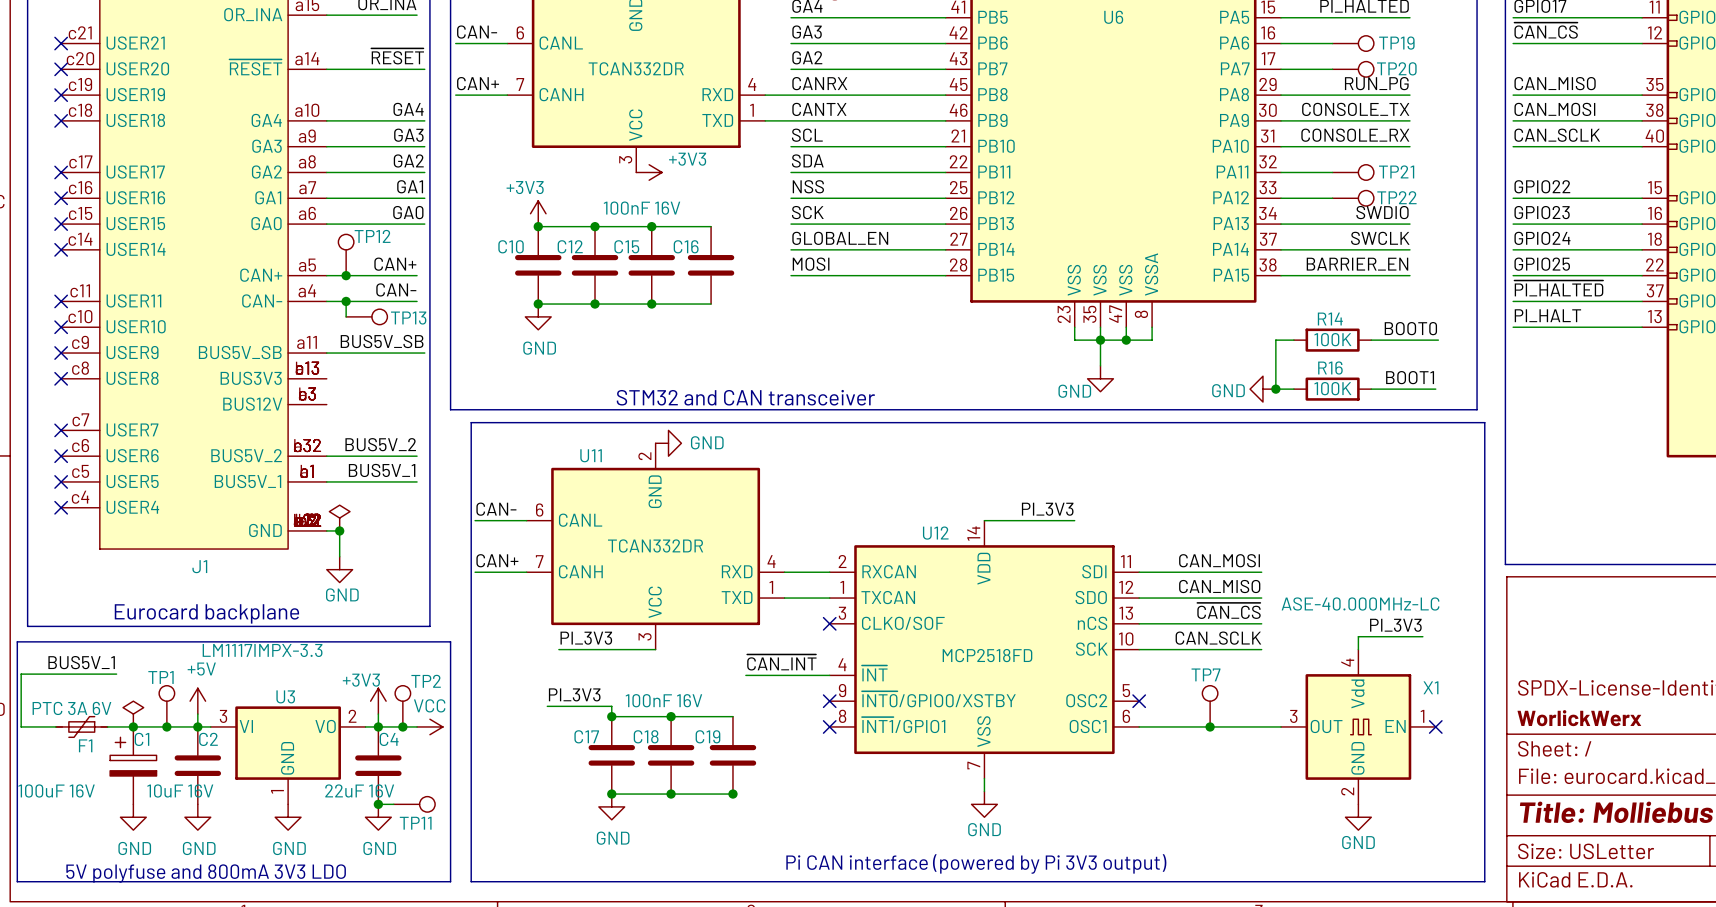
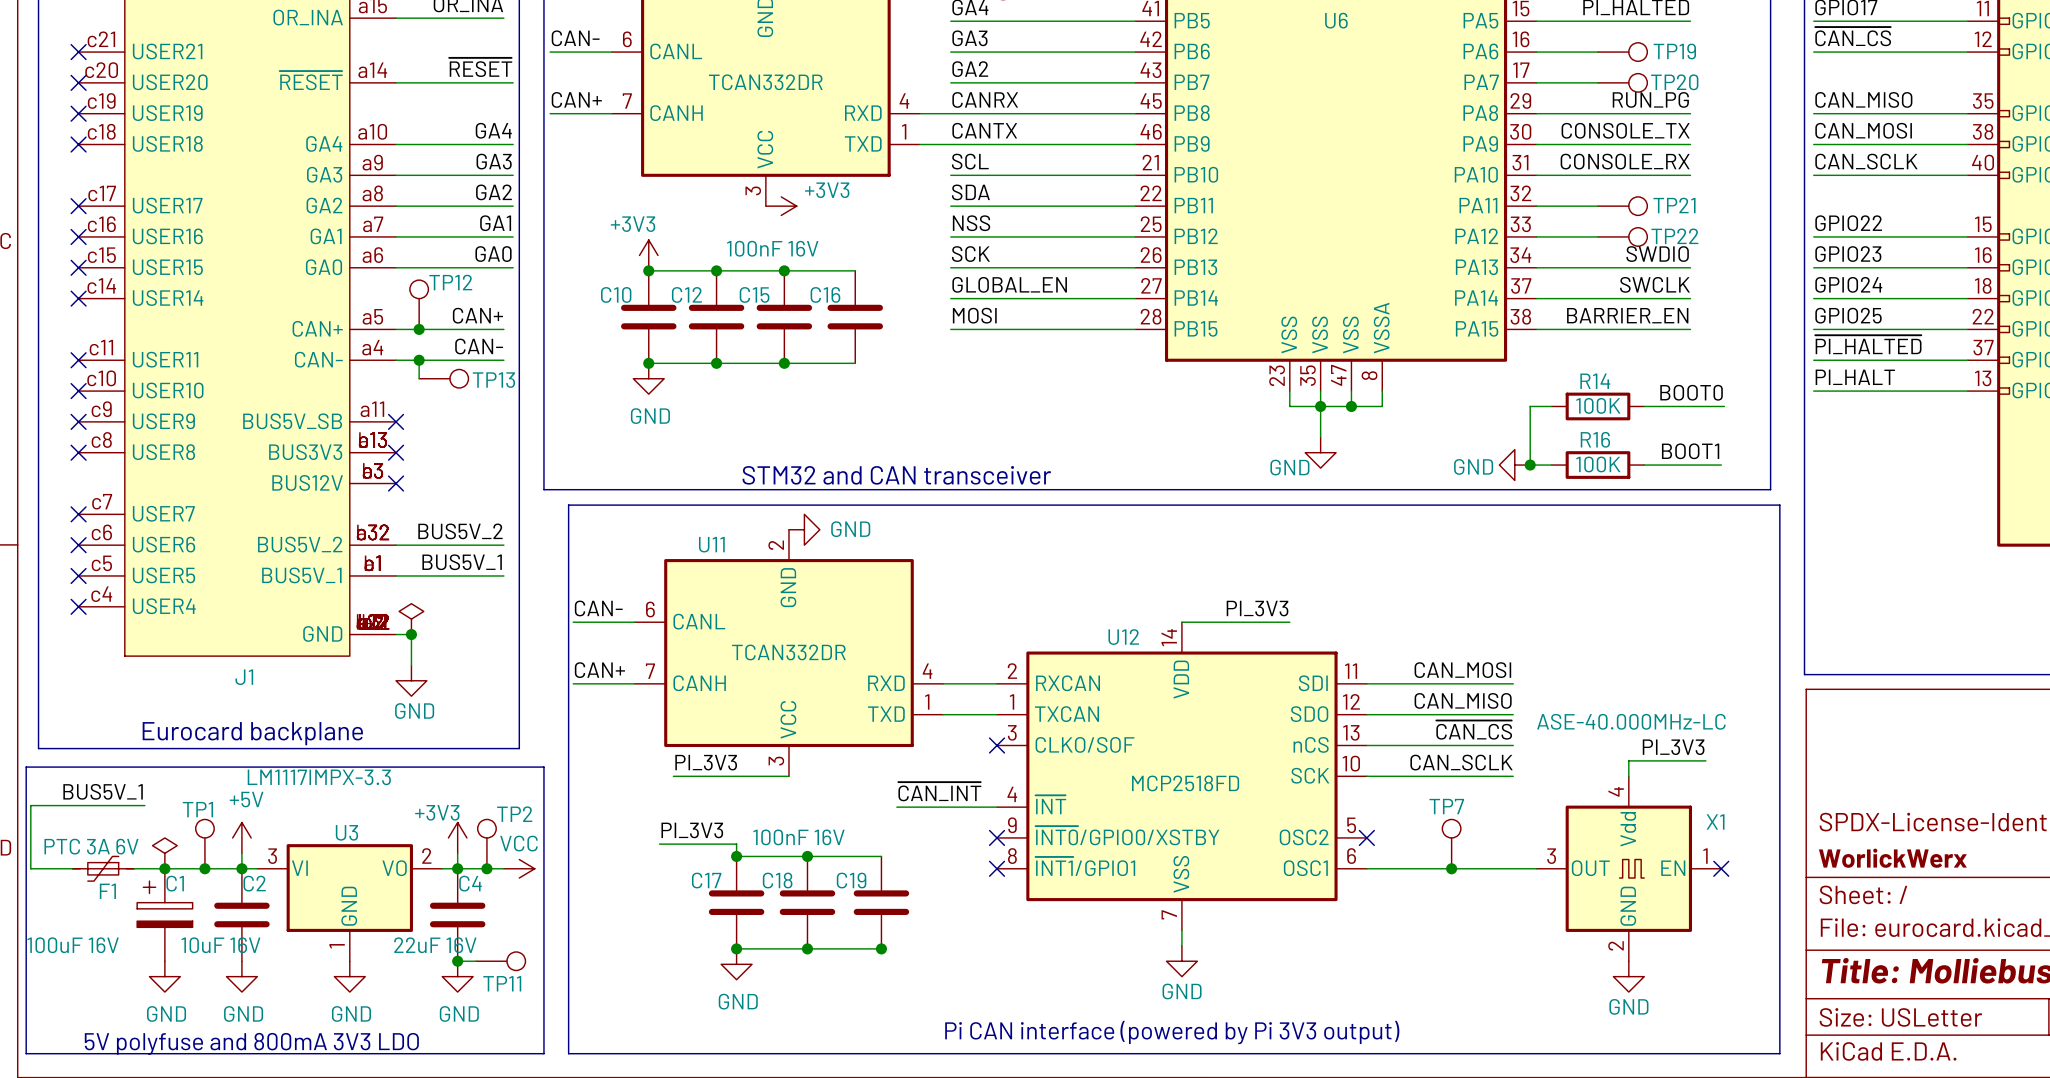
label: BUS5V_SB (382, 341) -> none
wire: (326, 353) (424, 353) -> none
no-connect mark: none -> (396, 421)
no-connect mark: none -> (396, 452)
no-connect mark: none -> (396, 483)

